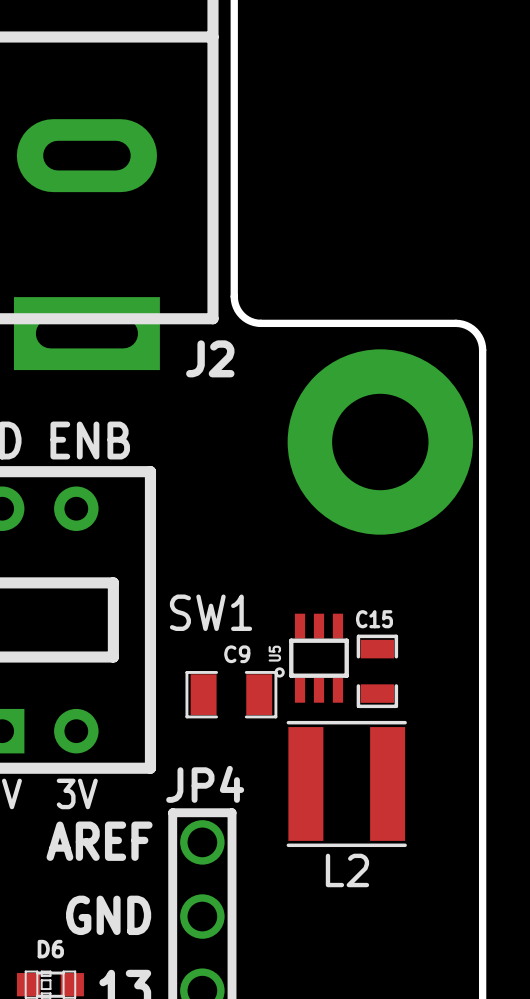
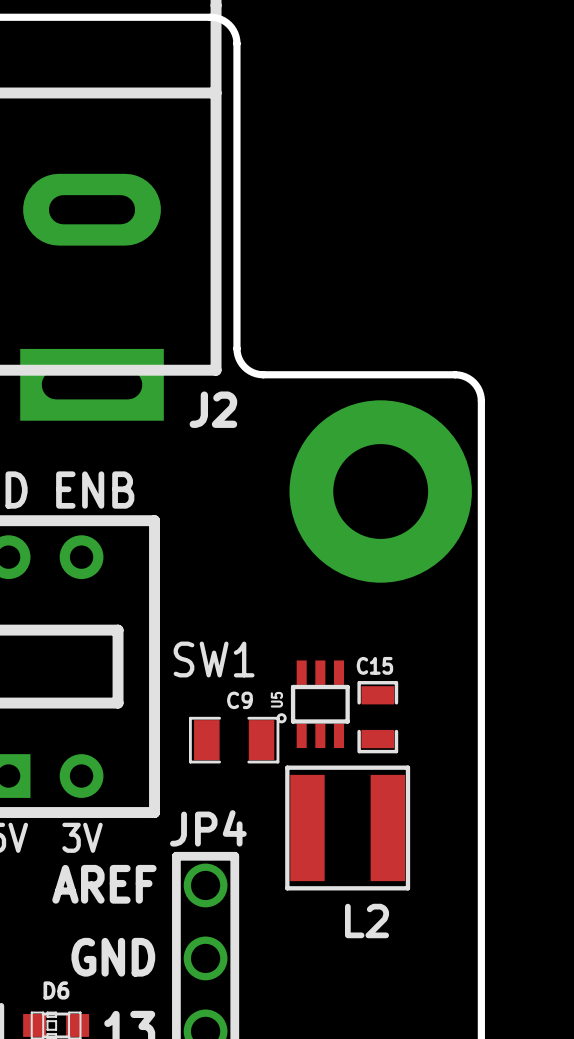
L2 footprint: [286, 720, 407, 848] -> [285, 765, 411, 891]

